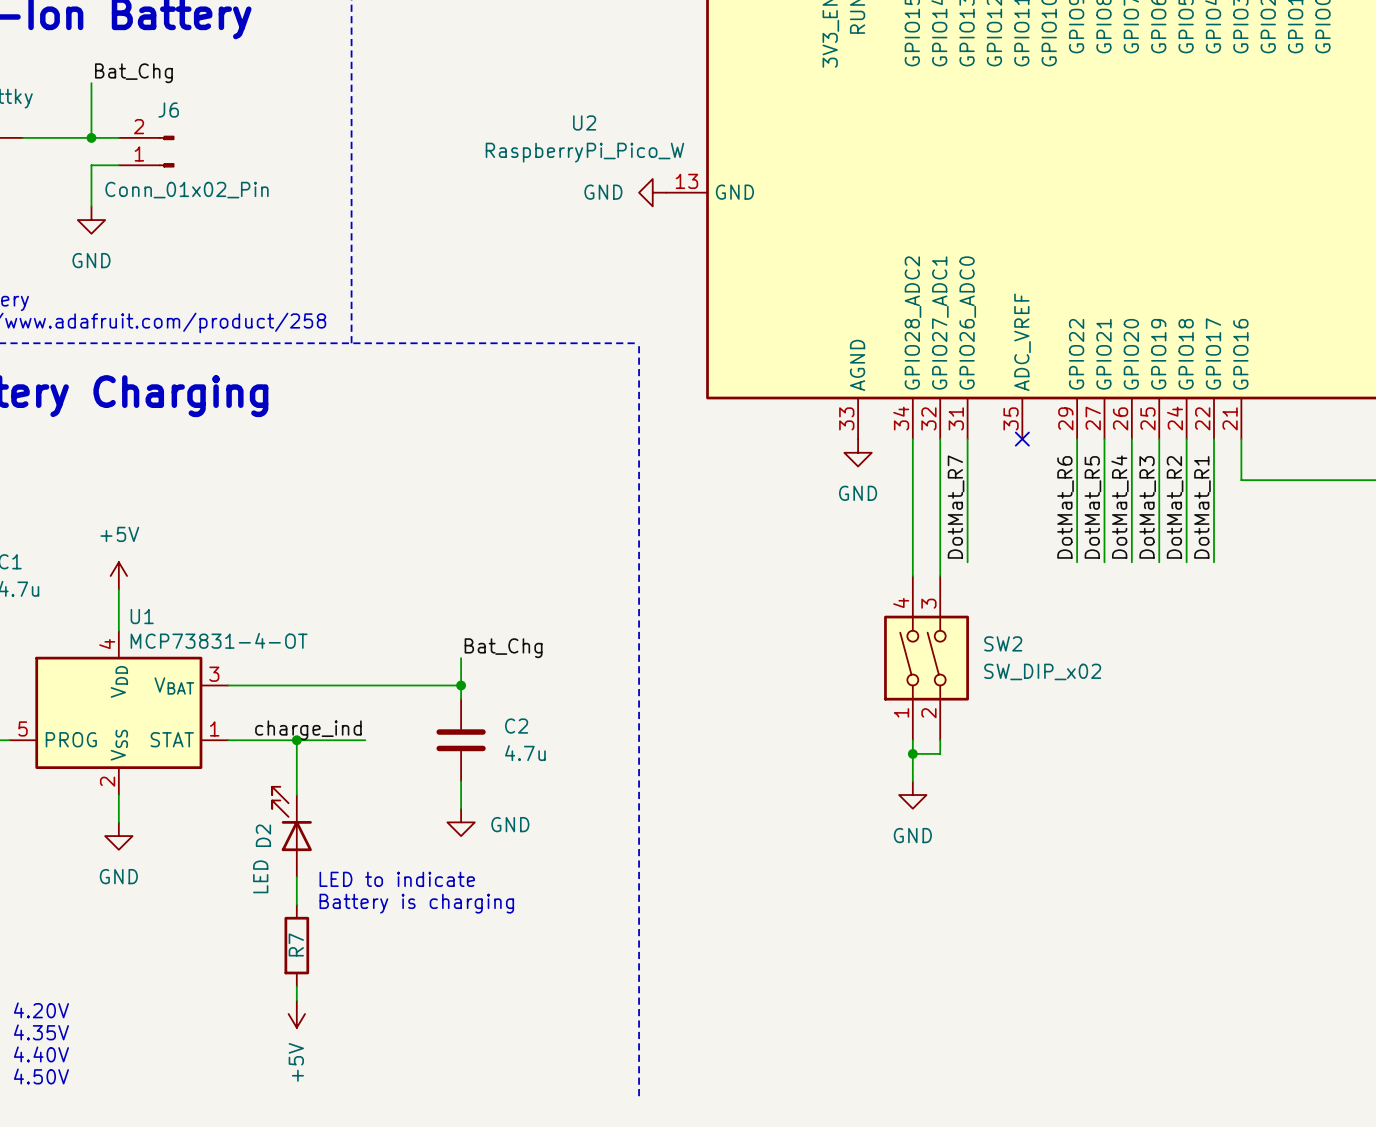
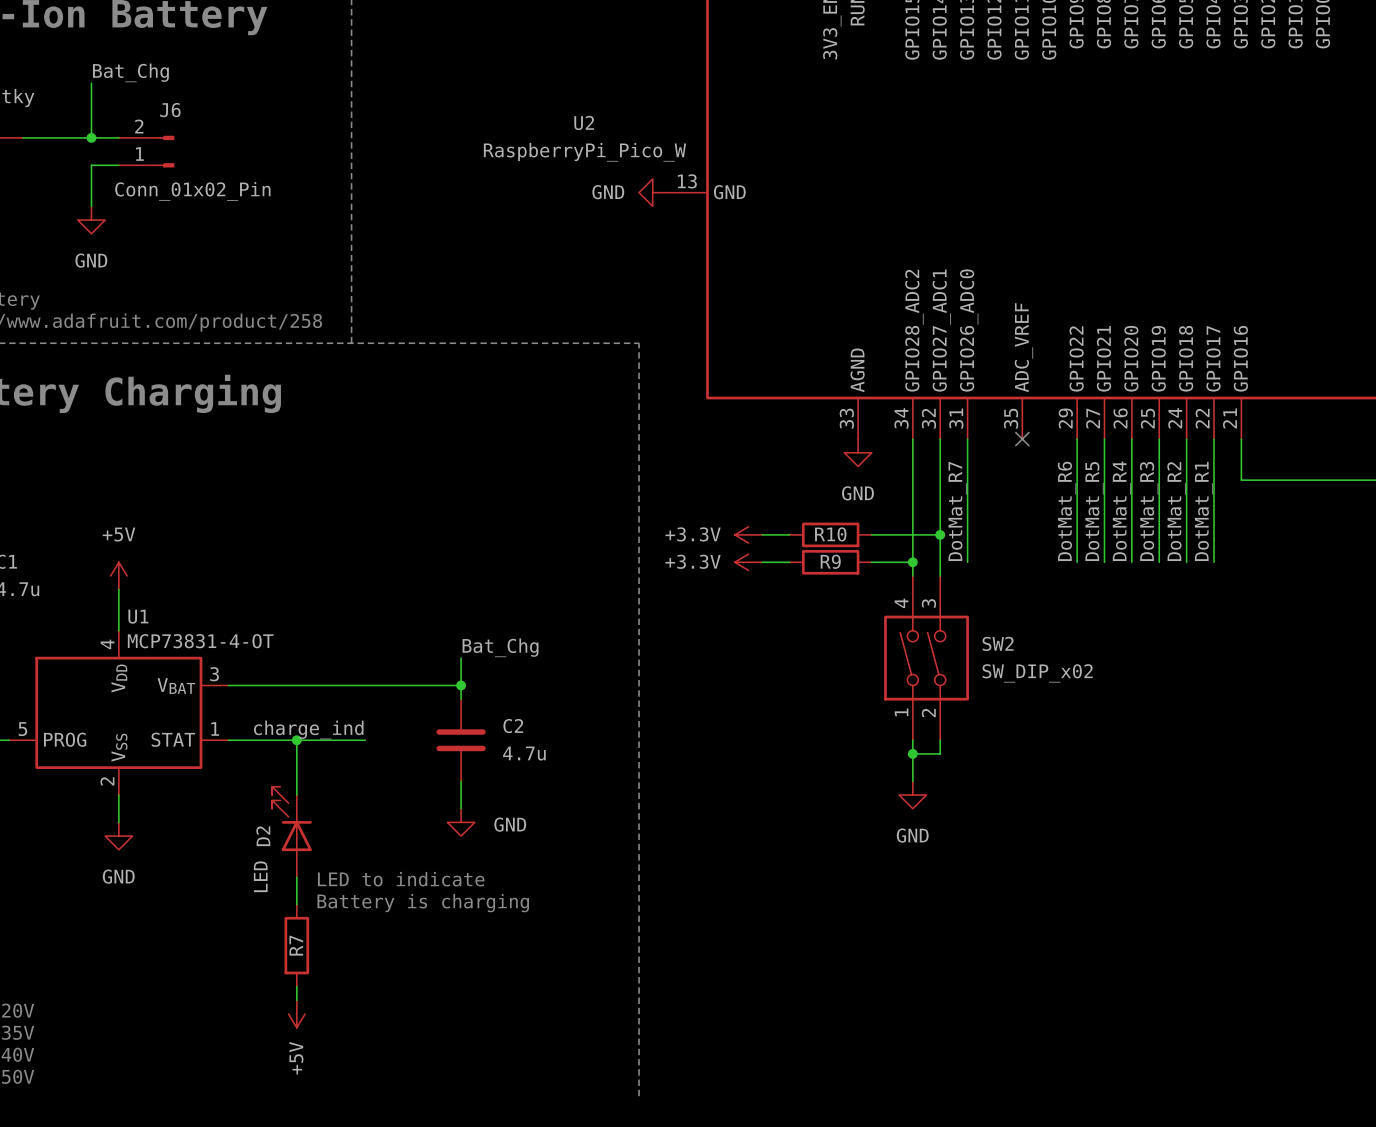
power symbol: none -> +3.3V (748, 534)
wire: none -> (762, 534) (789, 534)
R10: none -> (830, 534)
wire: none -> (871, 534) (940, 534)
junction: none -> (940, 534)
power symbol: none -> +3.3V (748, 562)
wire: none -> (762, 562) (789, 562)
R9: none -> (830, 562)
wire: none -> (871, 562) (912, 562)
junction: none -> (912, 562)

